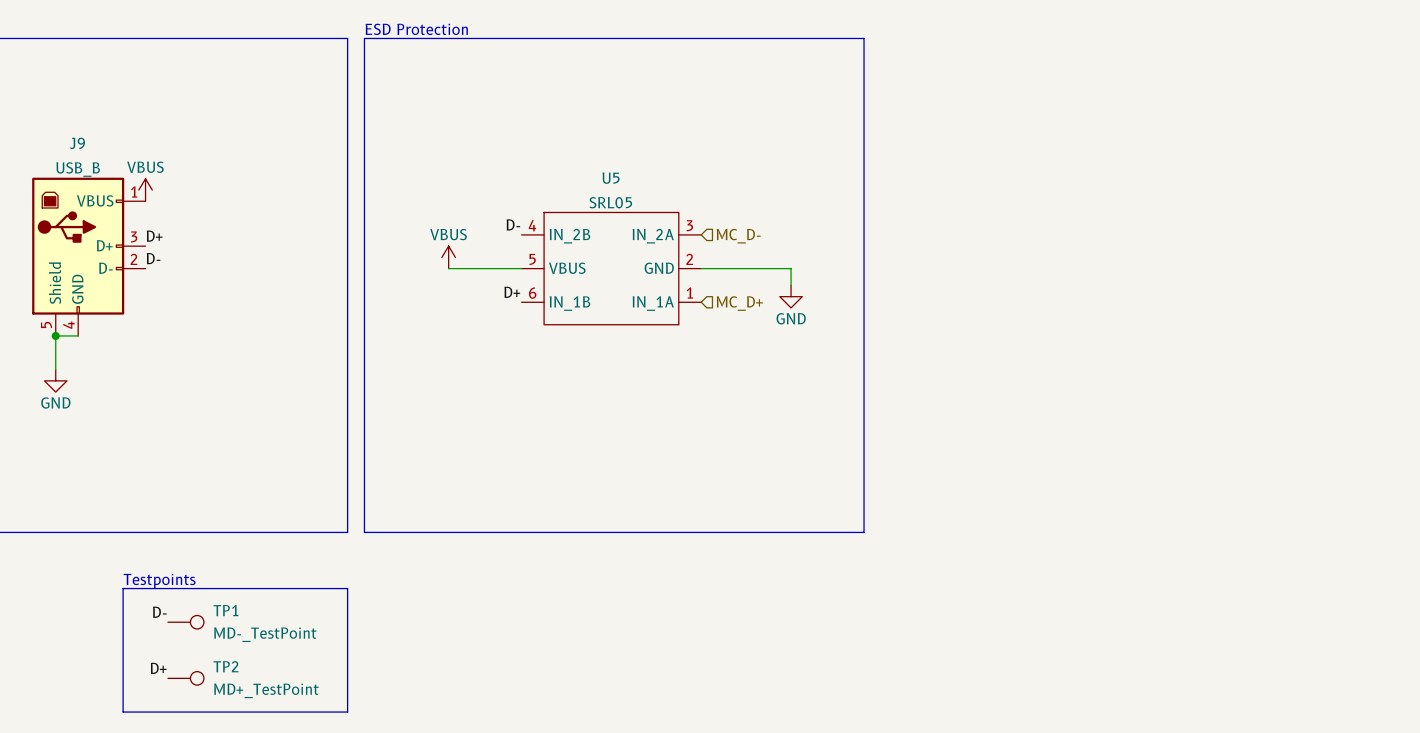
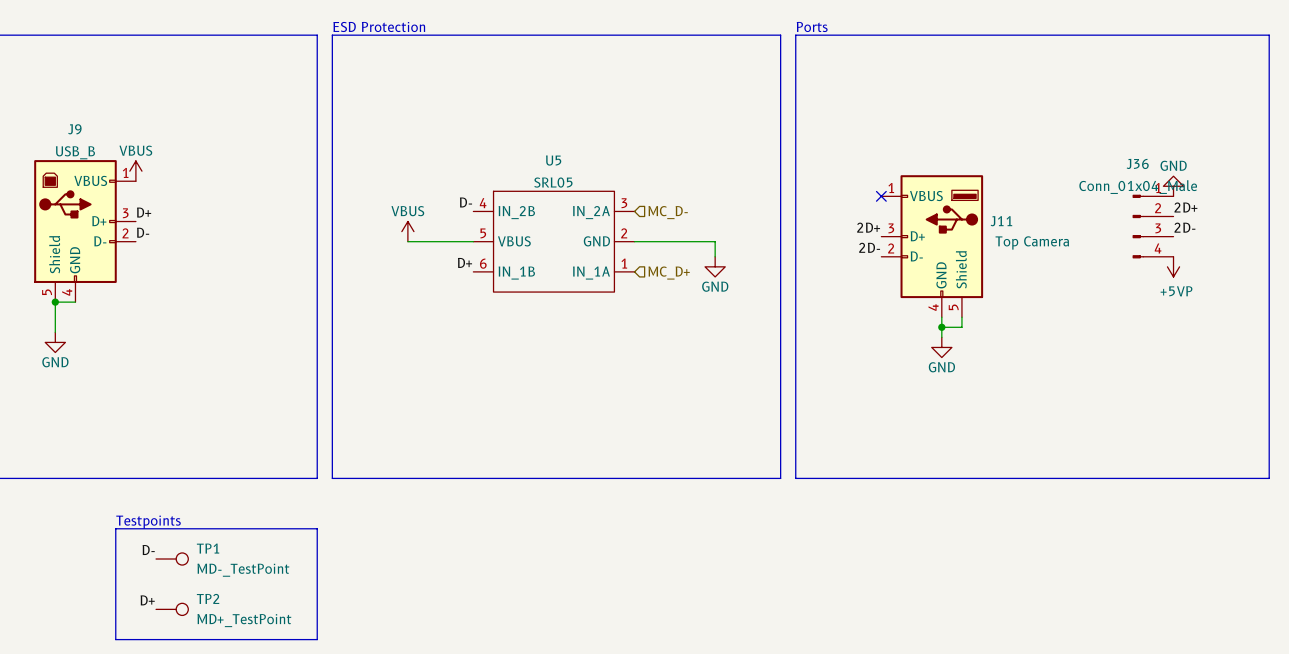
text: none -> Ports (812, 26)
line: none -> (795, 35) (1269, 35) (1269, 478) (795, 478) (795, 35)
power symbol: none -> GND (1173, 186)
no-connect mark: none -> (881, 196)
label: none -> 2D+ (1185, 207)
J36: none -> Conn_01x04_Male (1153, 226)
label: none -> 2D+ (868, 227)
label: none -> 2D- (1184, 227)
J11: none -> Top Camera (932, 246)
label: none -> 2D- (869, 247)
power symbol: none -> +5VP (1173, 266)
wire: none -> (941, 317) (941, 337)
wire: none -> (961, 317) (961, 327) (941, 327)
junction: none -> (941, 327)
power symbol: none -> GND (941, 347)

